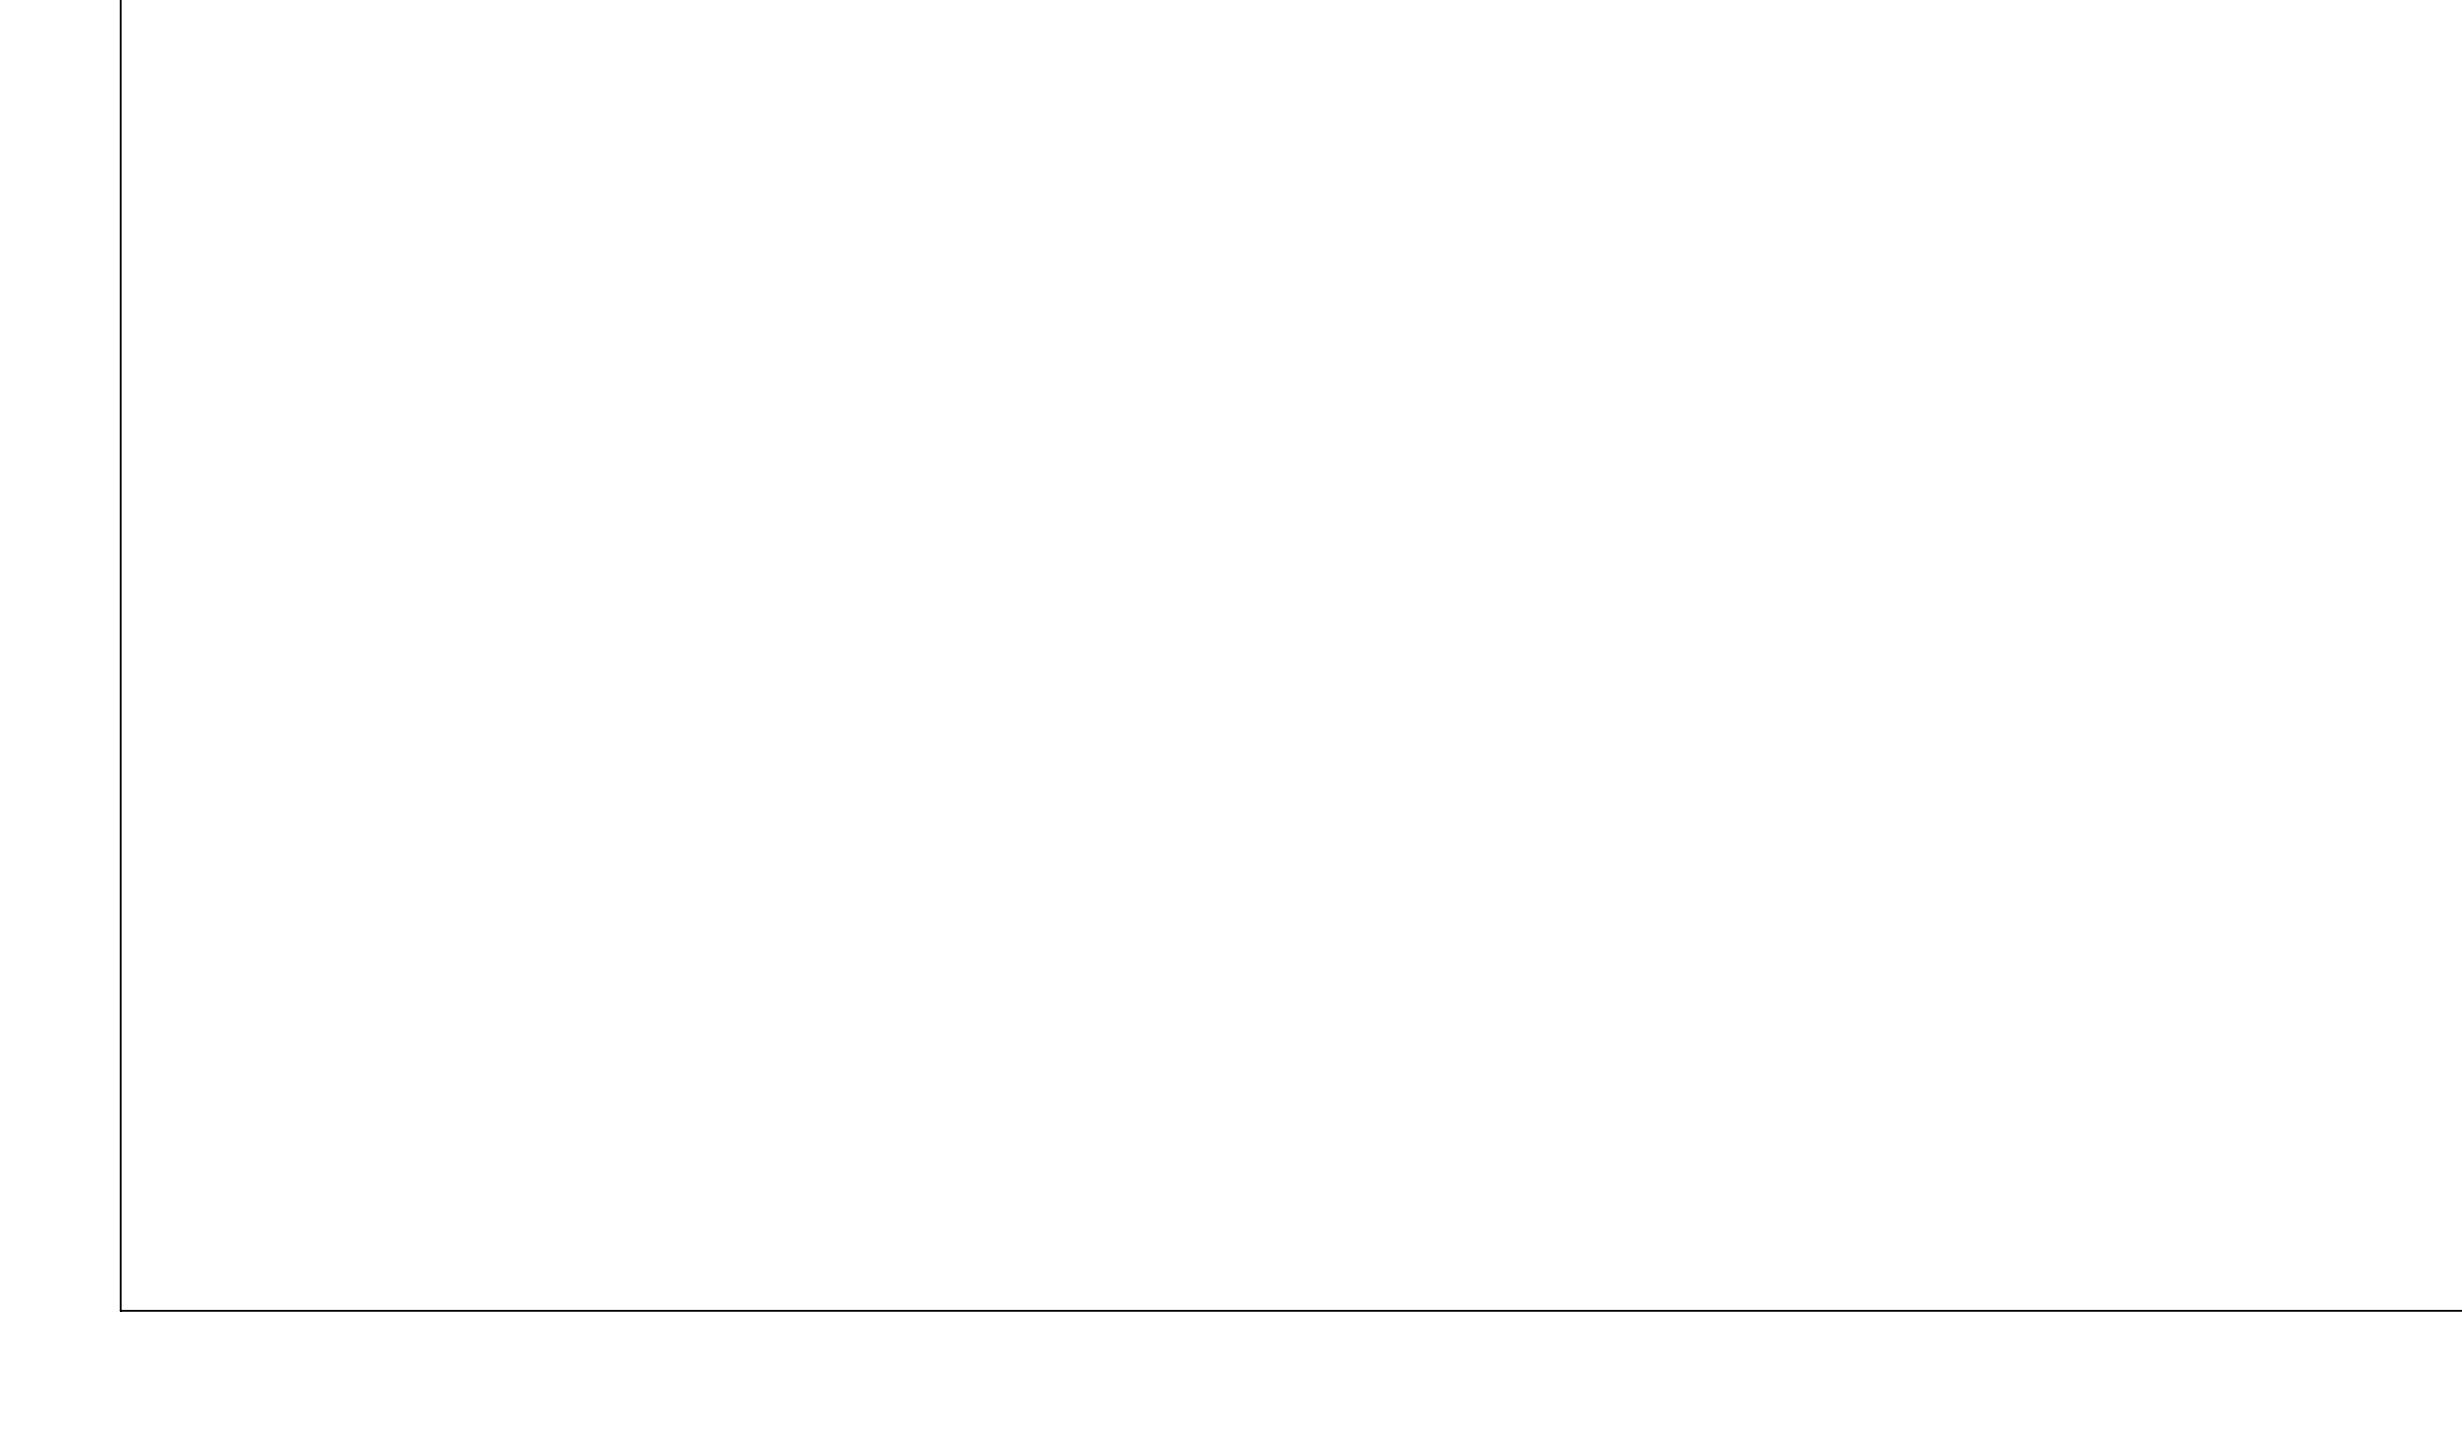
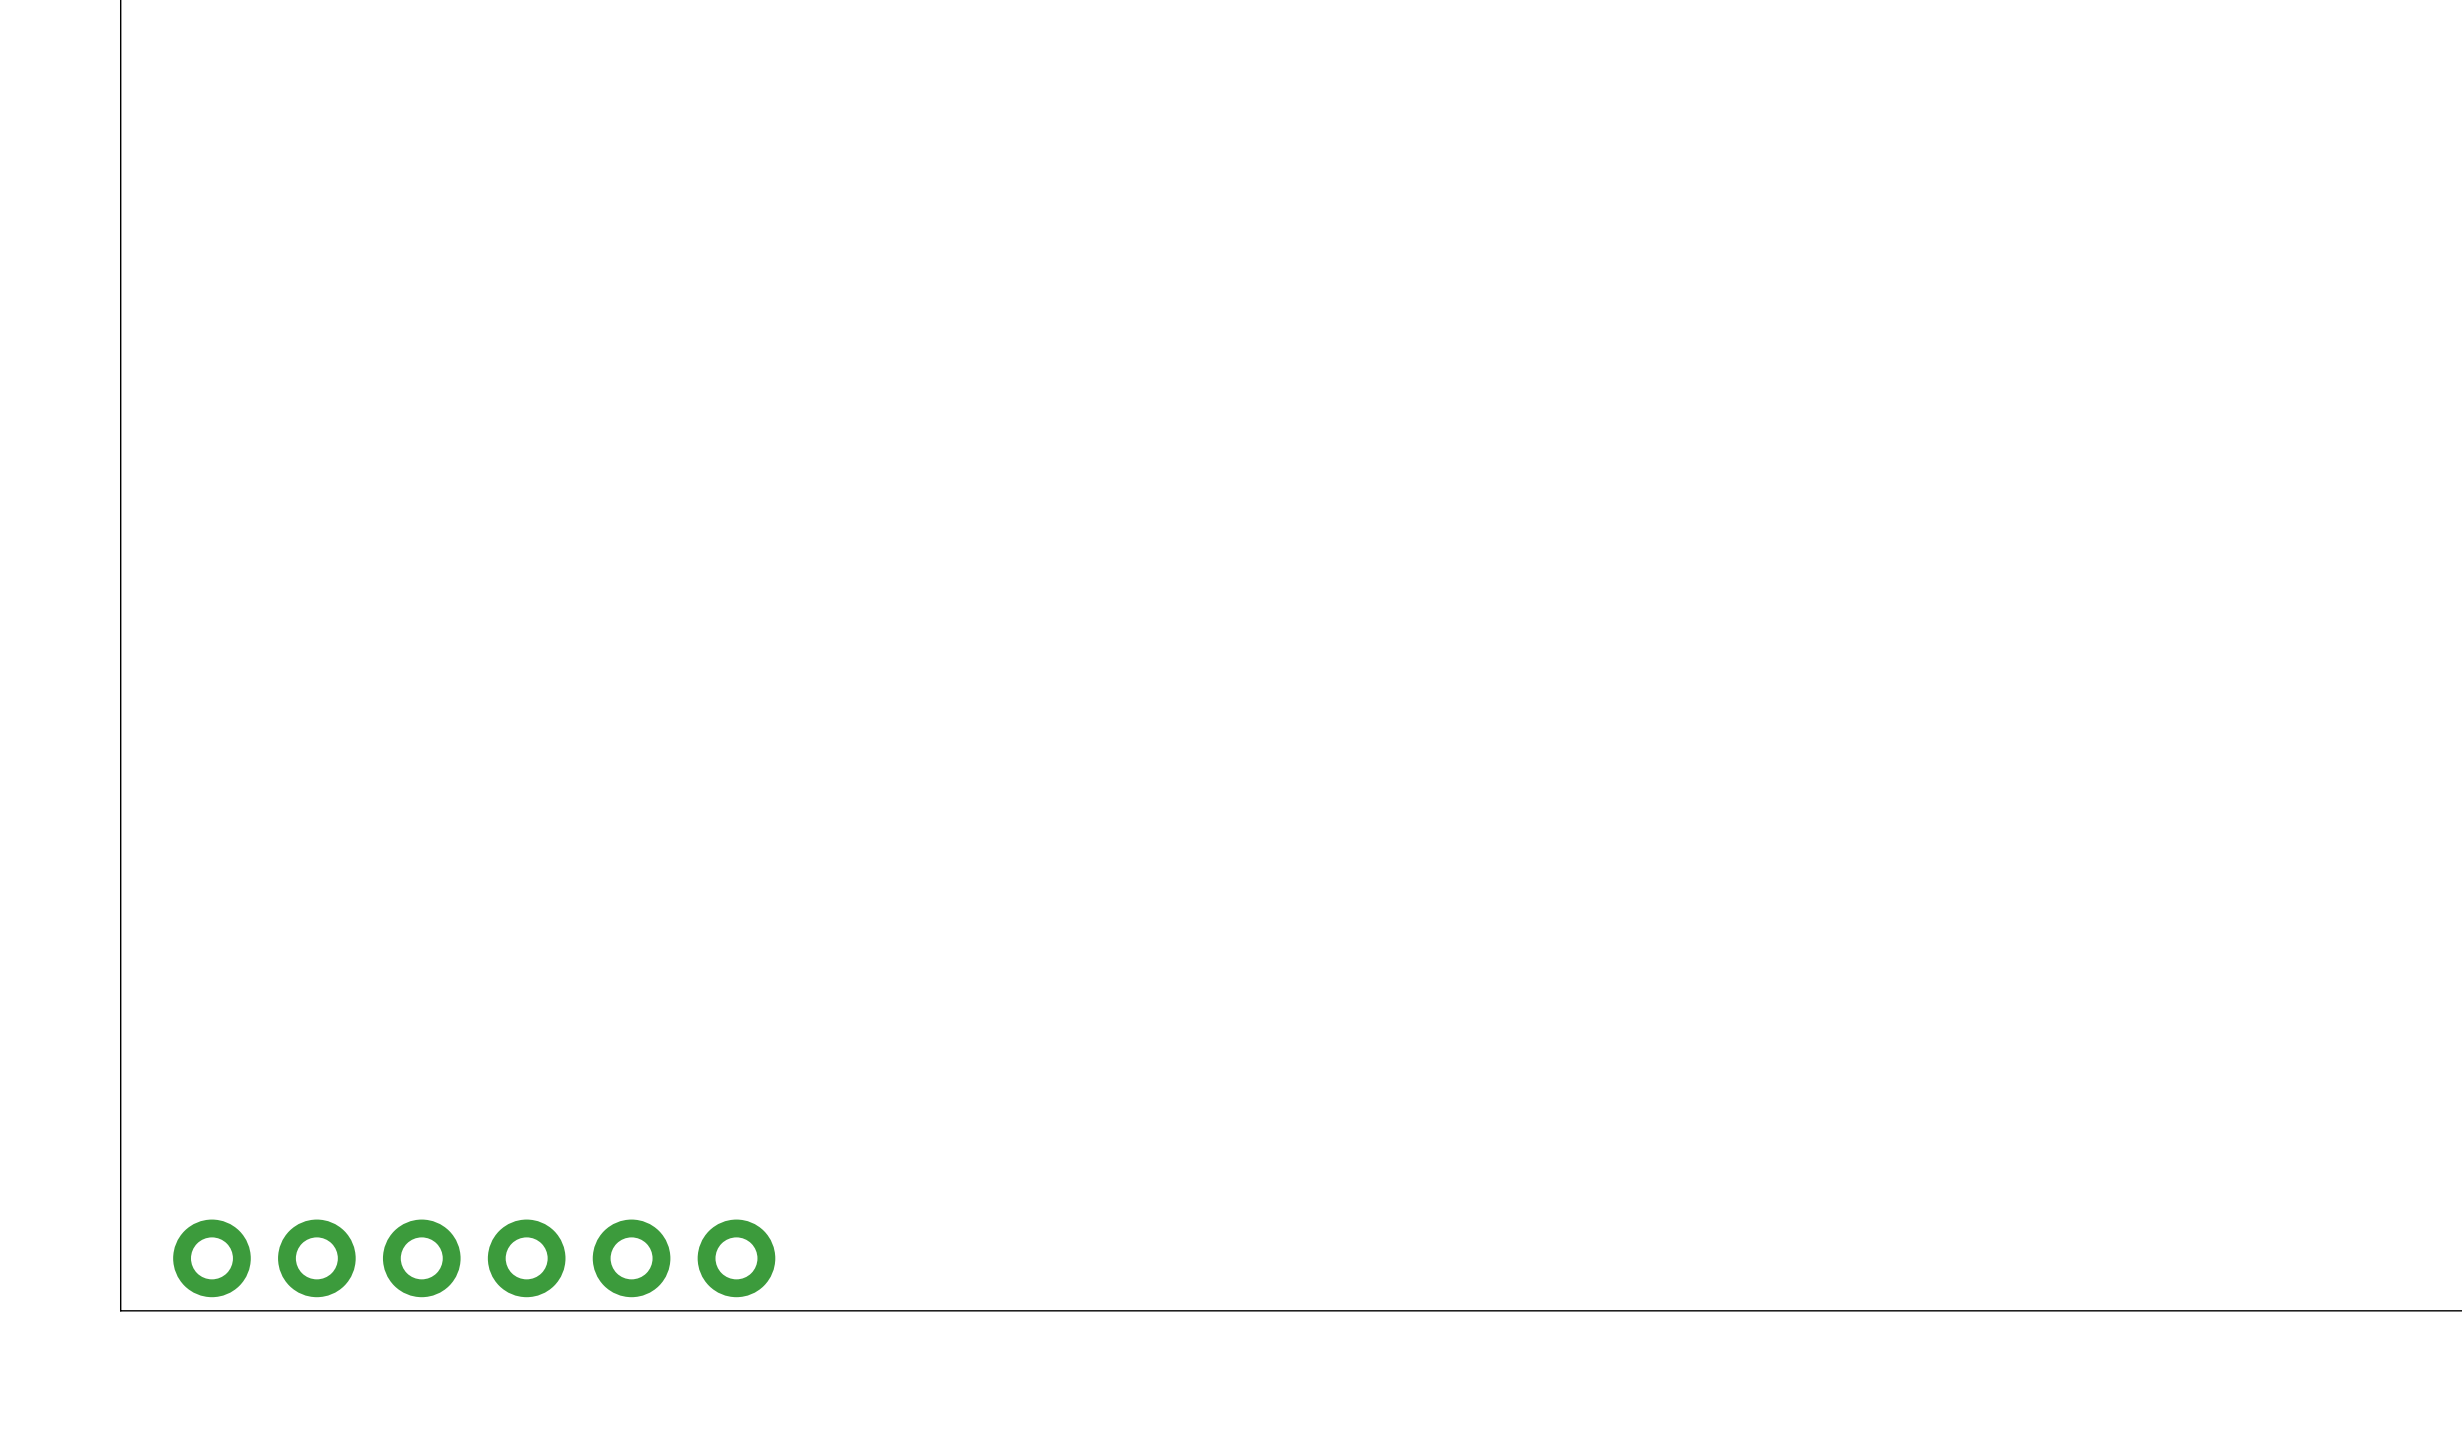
part: none -> (474, 1258)

